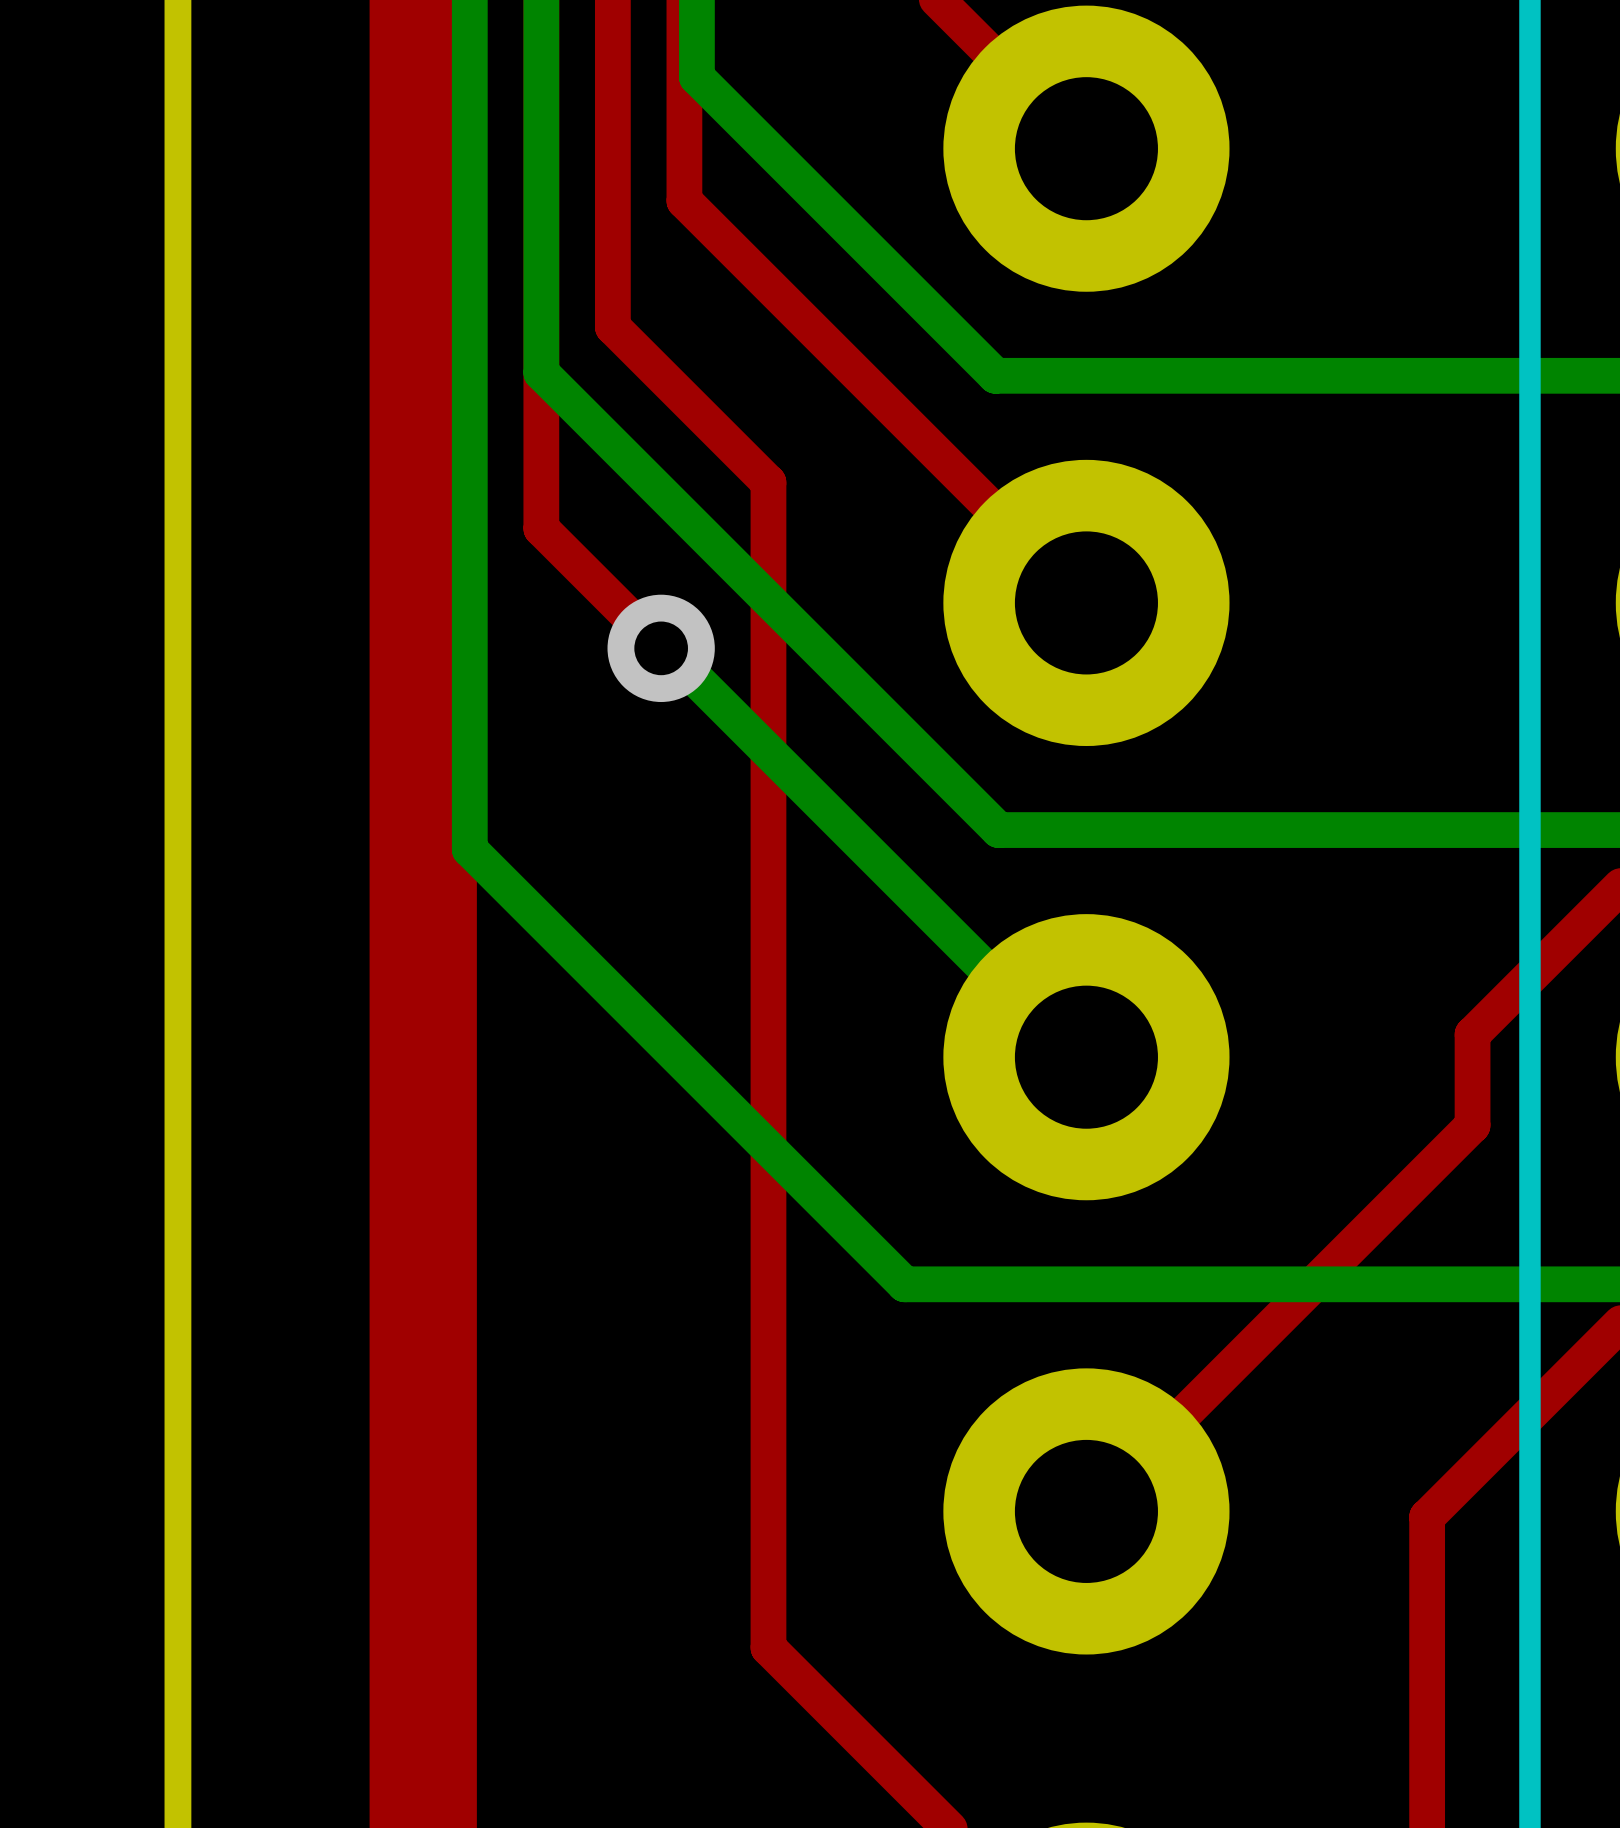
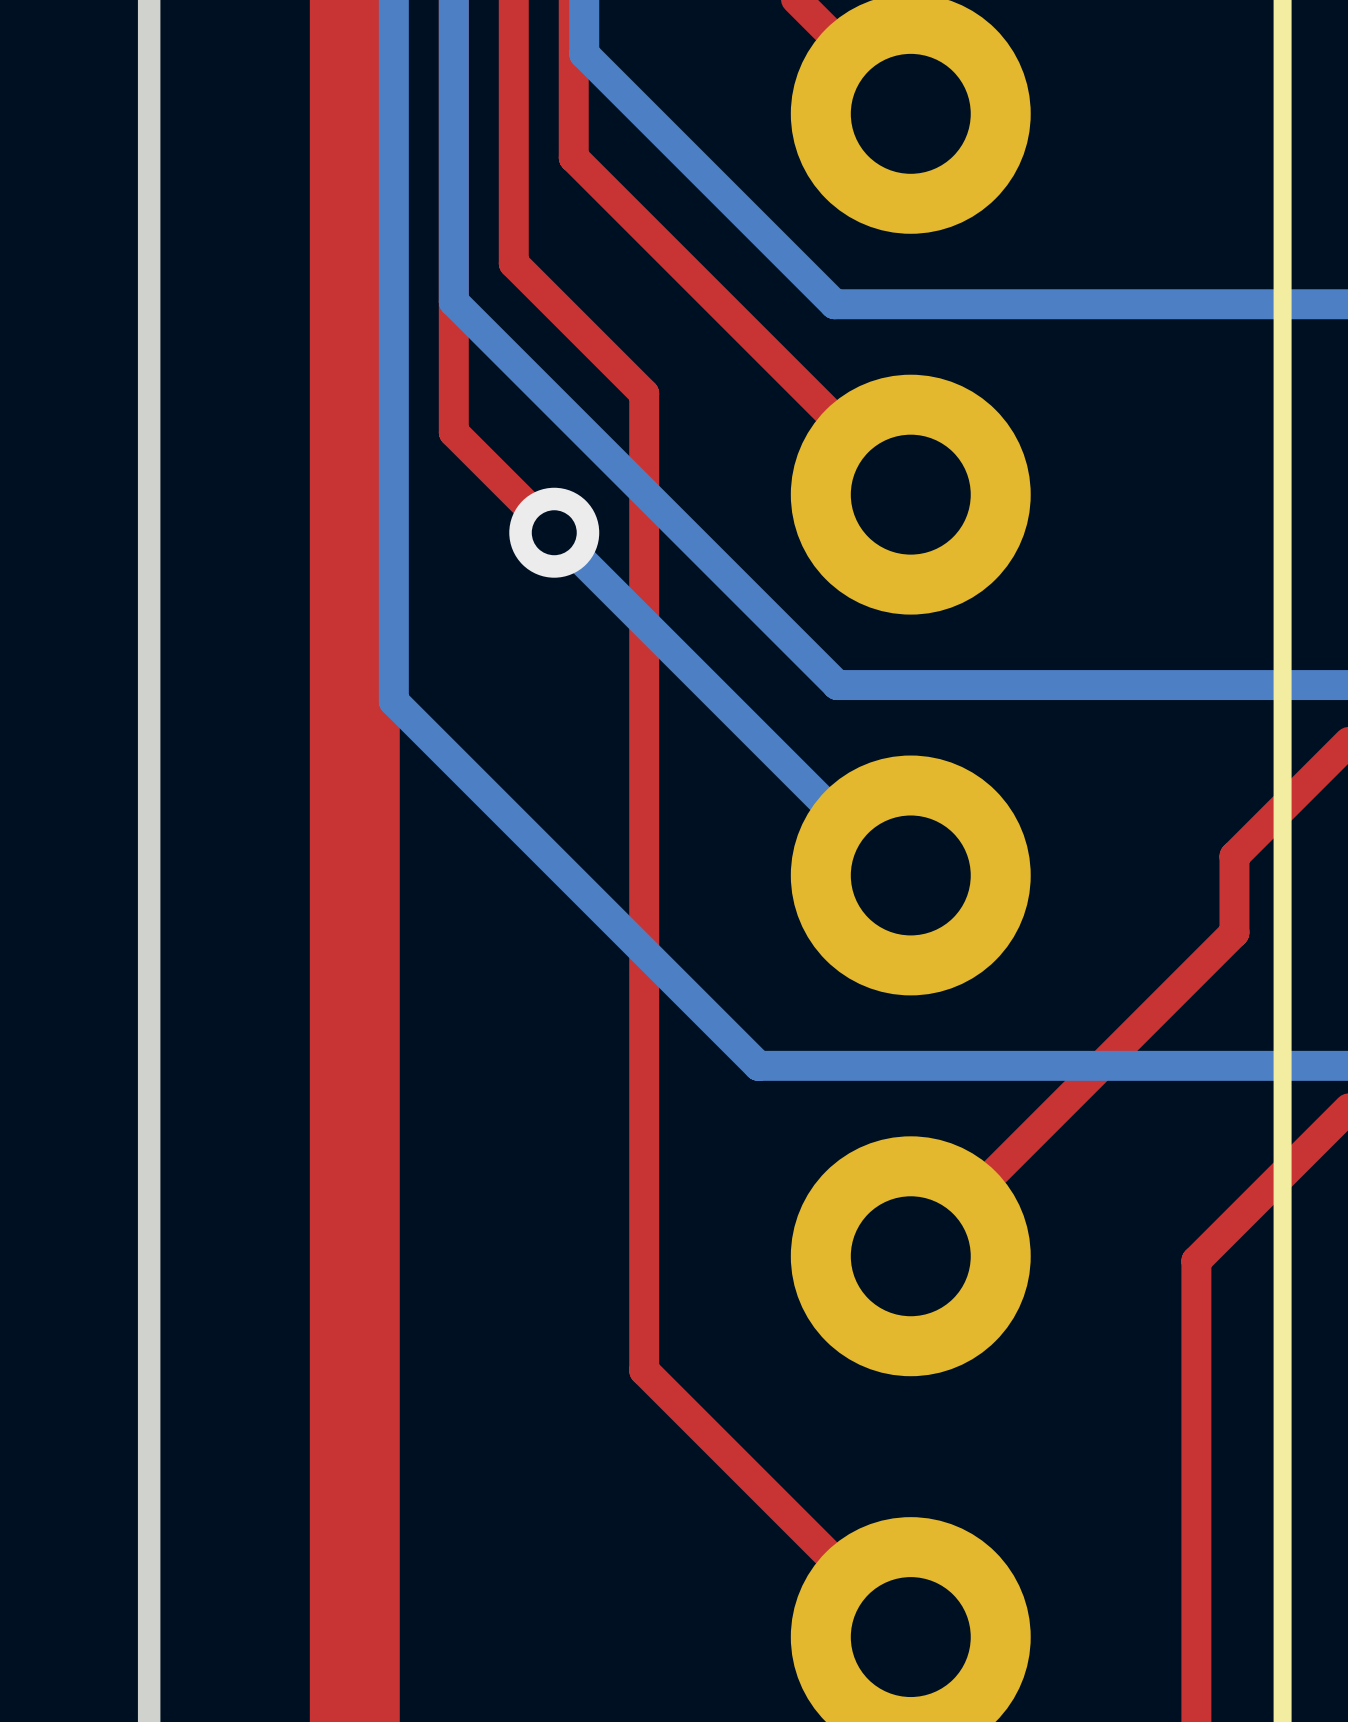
bottom track: (661, 648) (665, 648) (1074, 1057) (1086, 1057) -> (554, 532) (910, 889)

